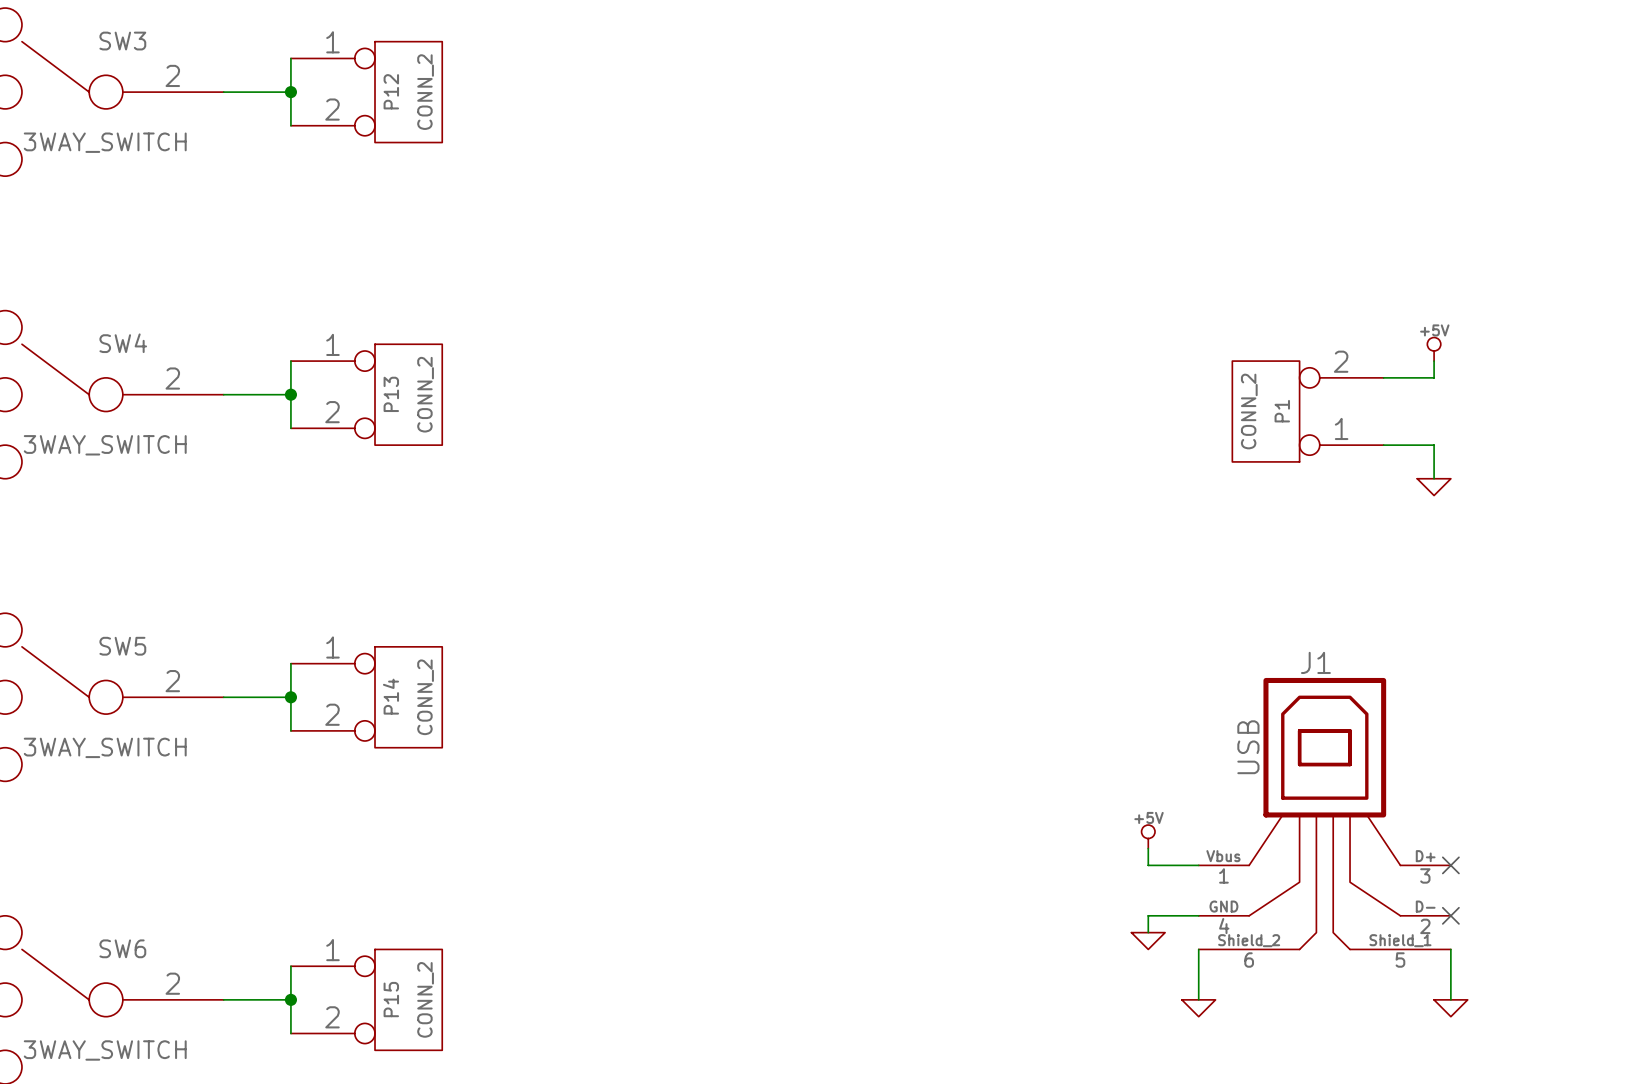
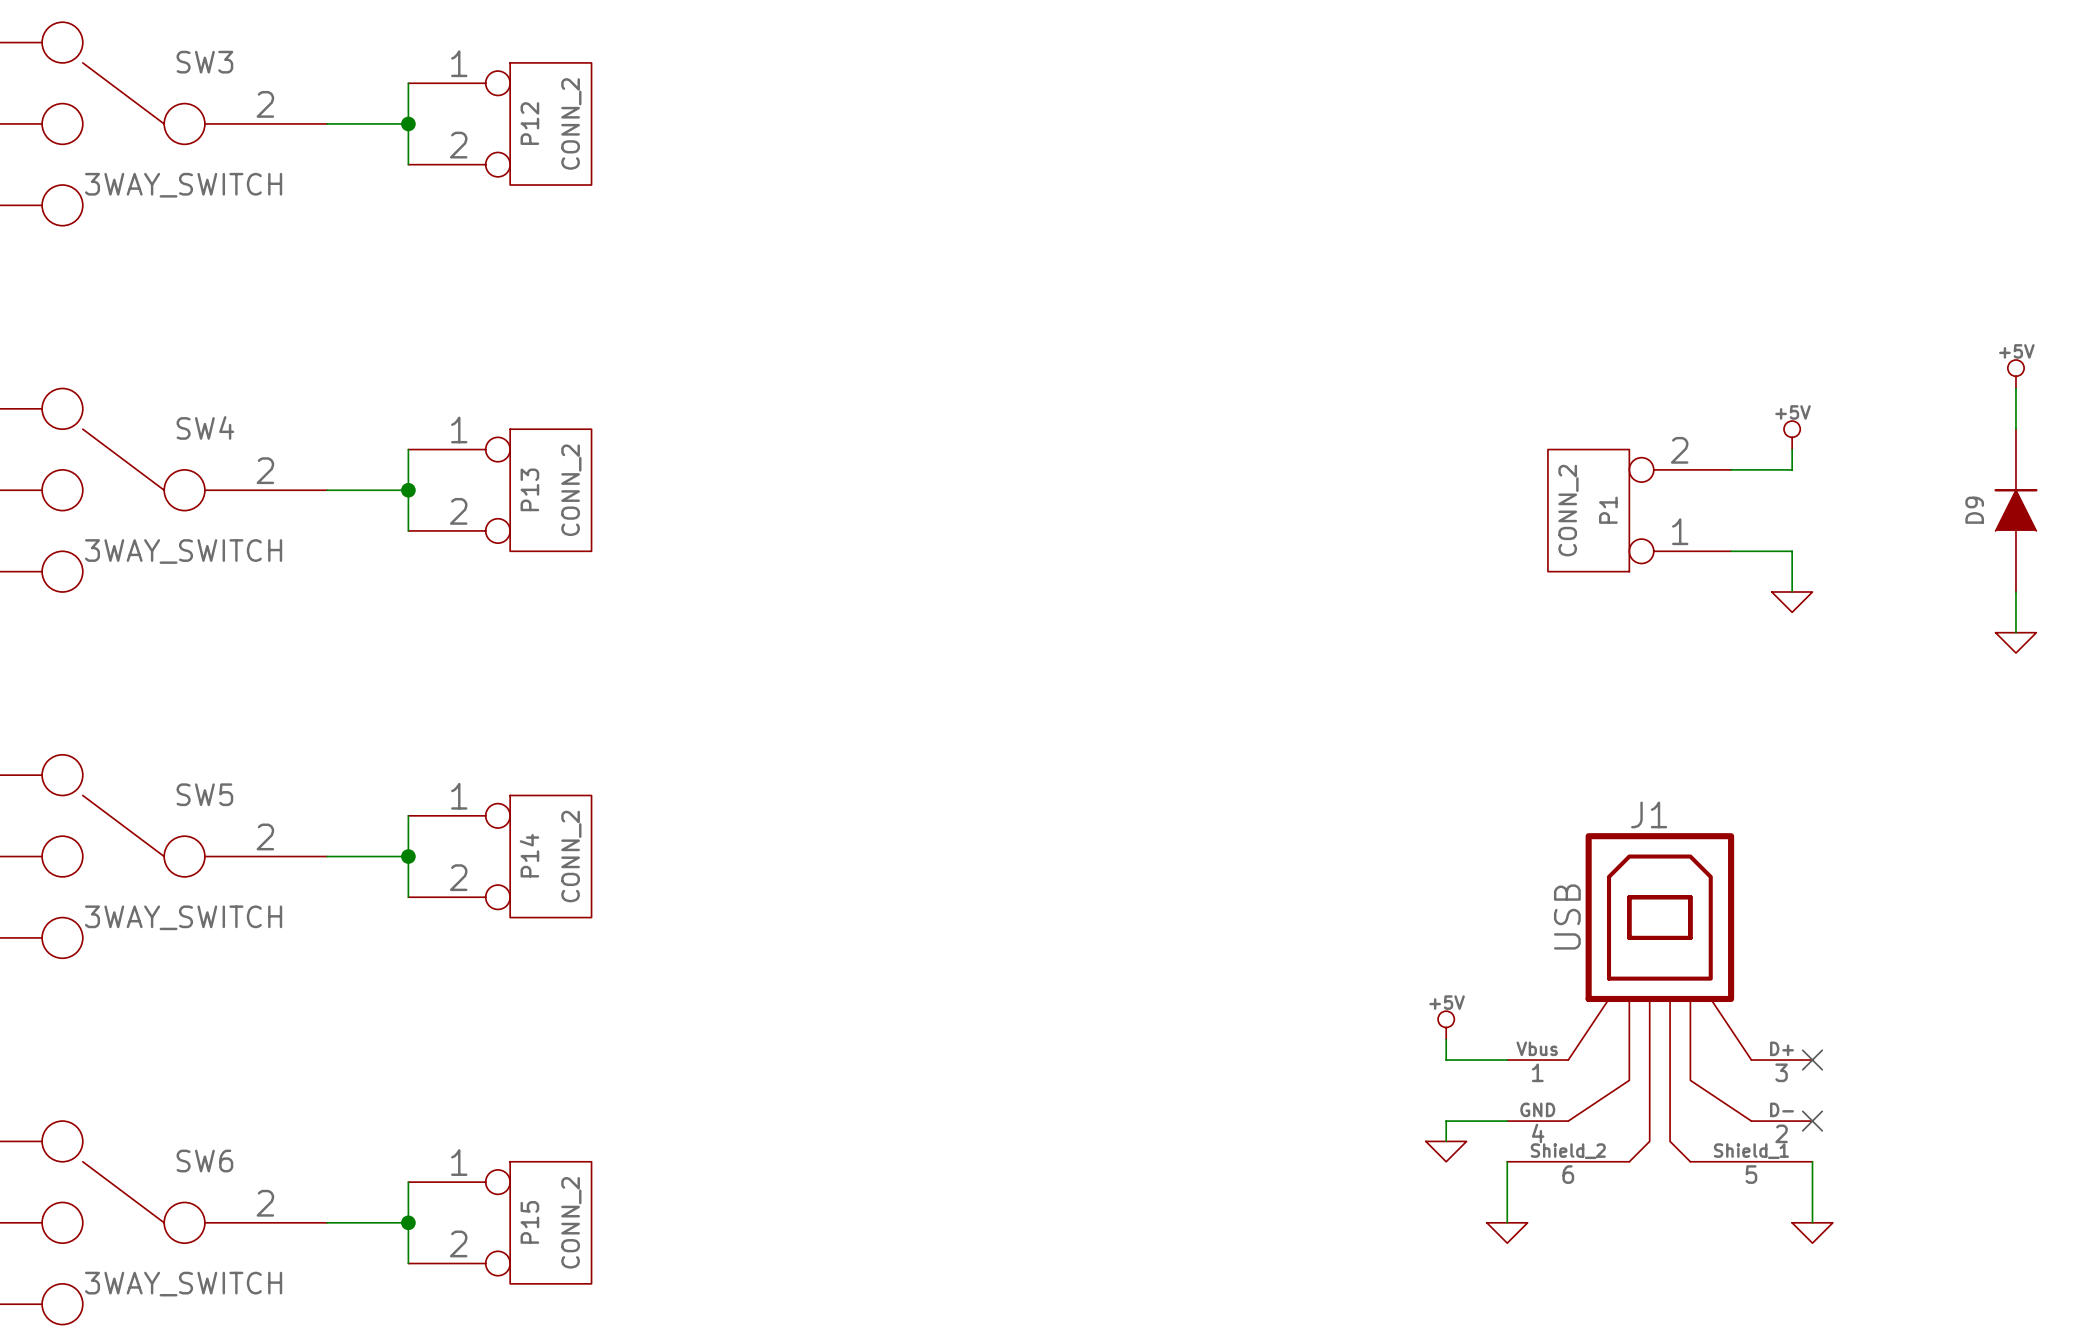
power symbol: none -> +5V (2015, 374)
wire: none -> (2015, 388) (2015, 429)
D9: none -> (2015, 510)
wire: none -> (2015, 591) (2015, 632)
power symbol: none -> (2015, 642)

